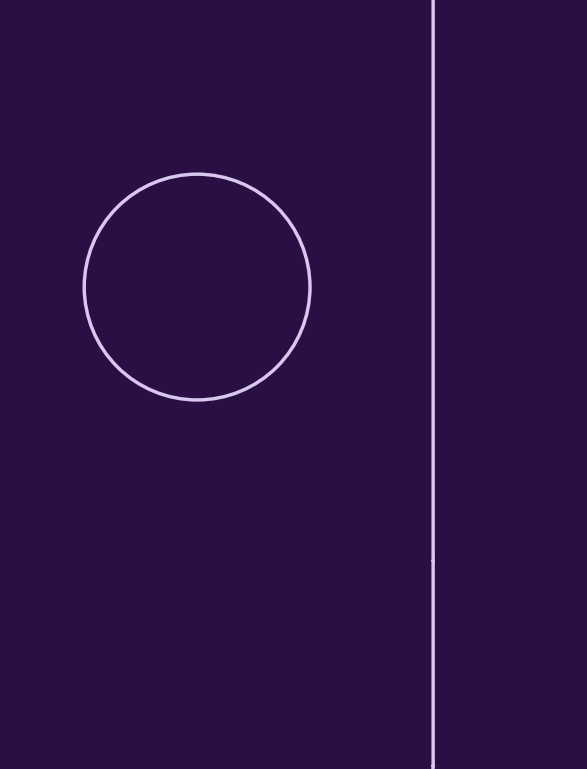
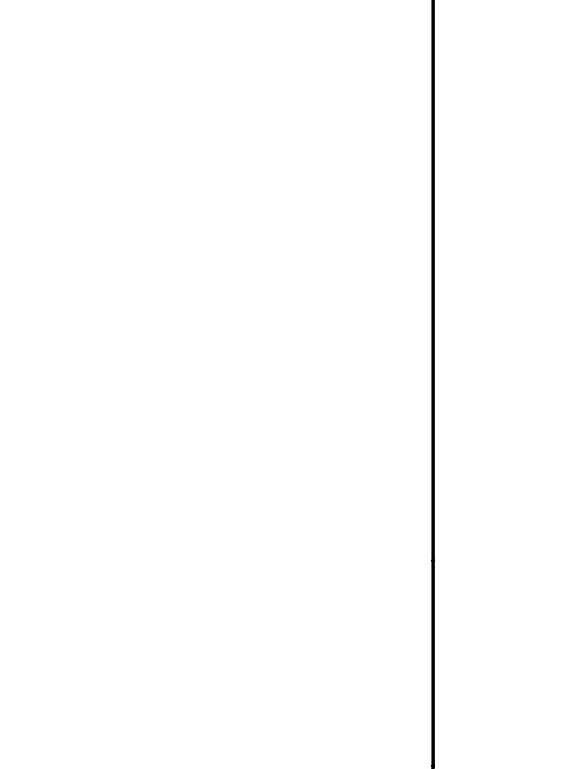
round board edge: [82, 172, 312, 402] -> none

